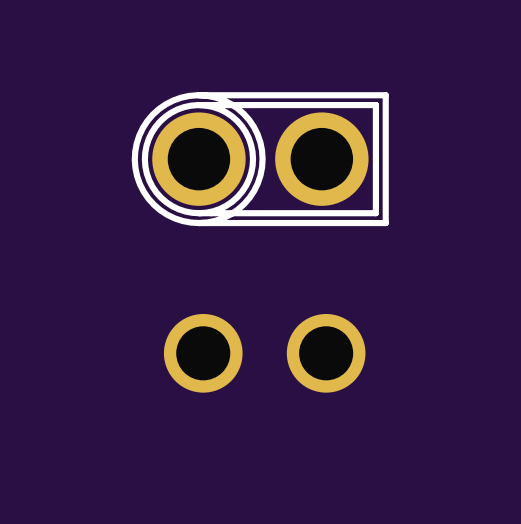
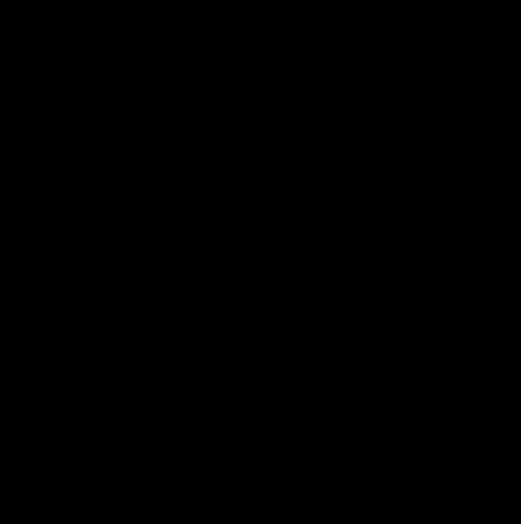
part: (260, 159) -> none
part: (264, 353) -> none

